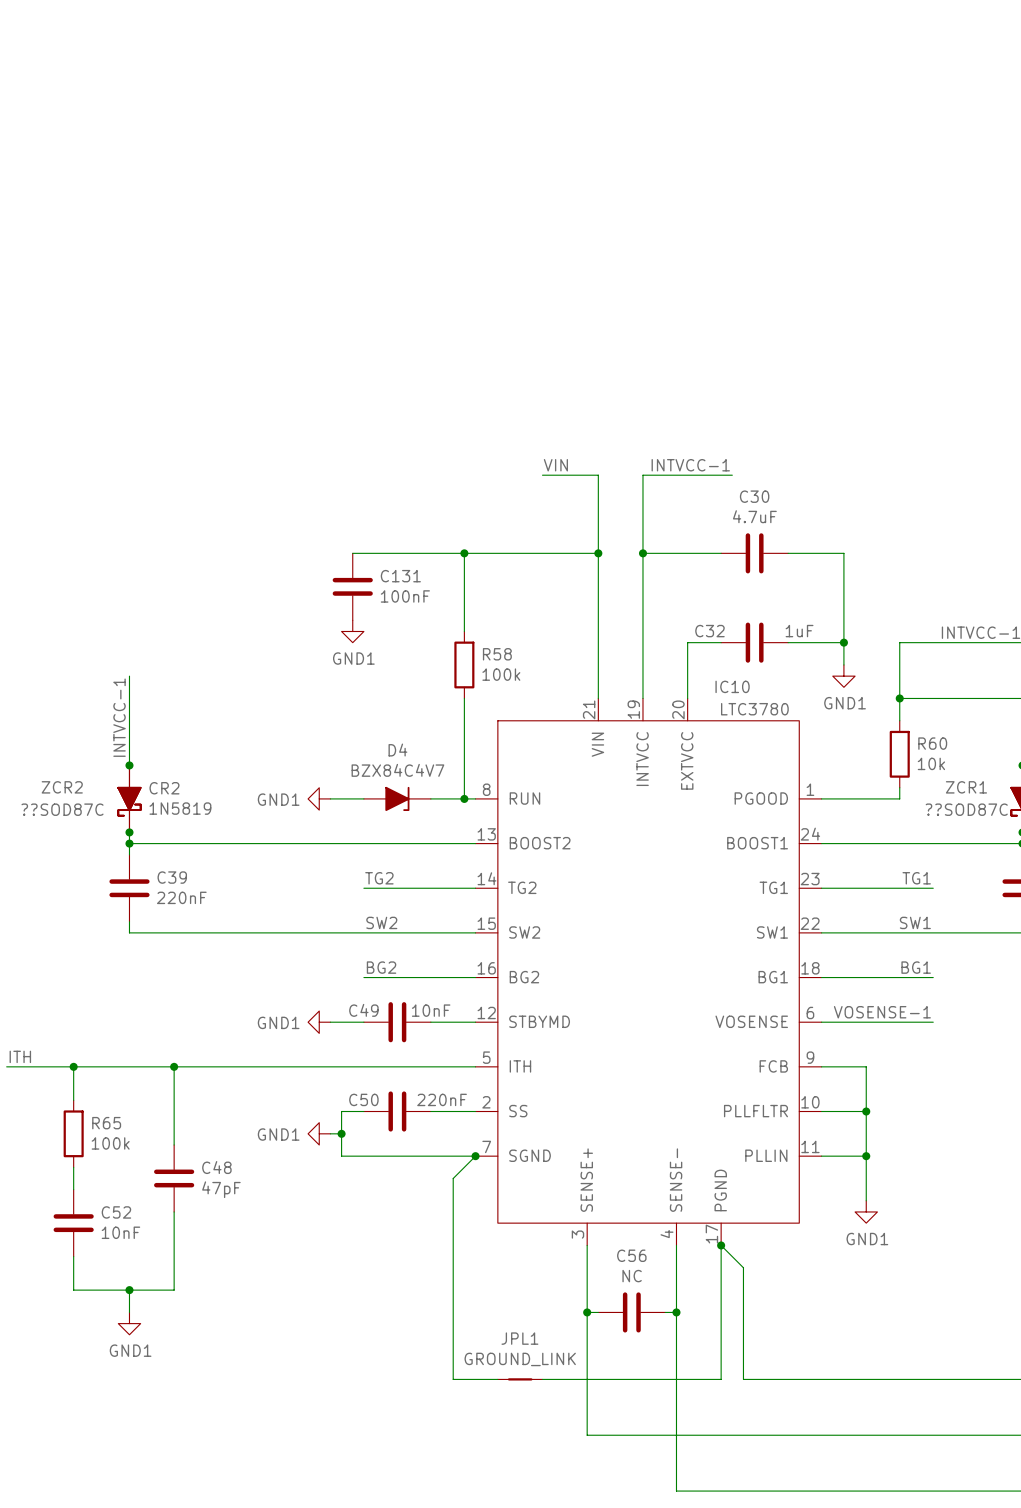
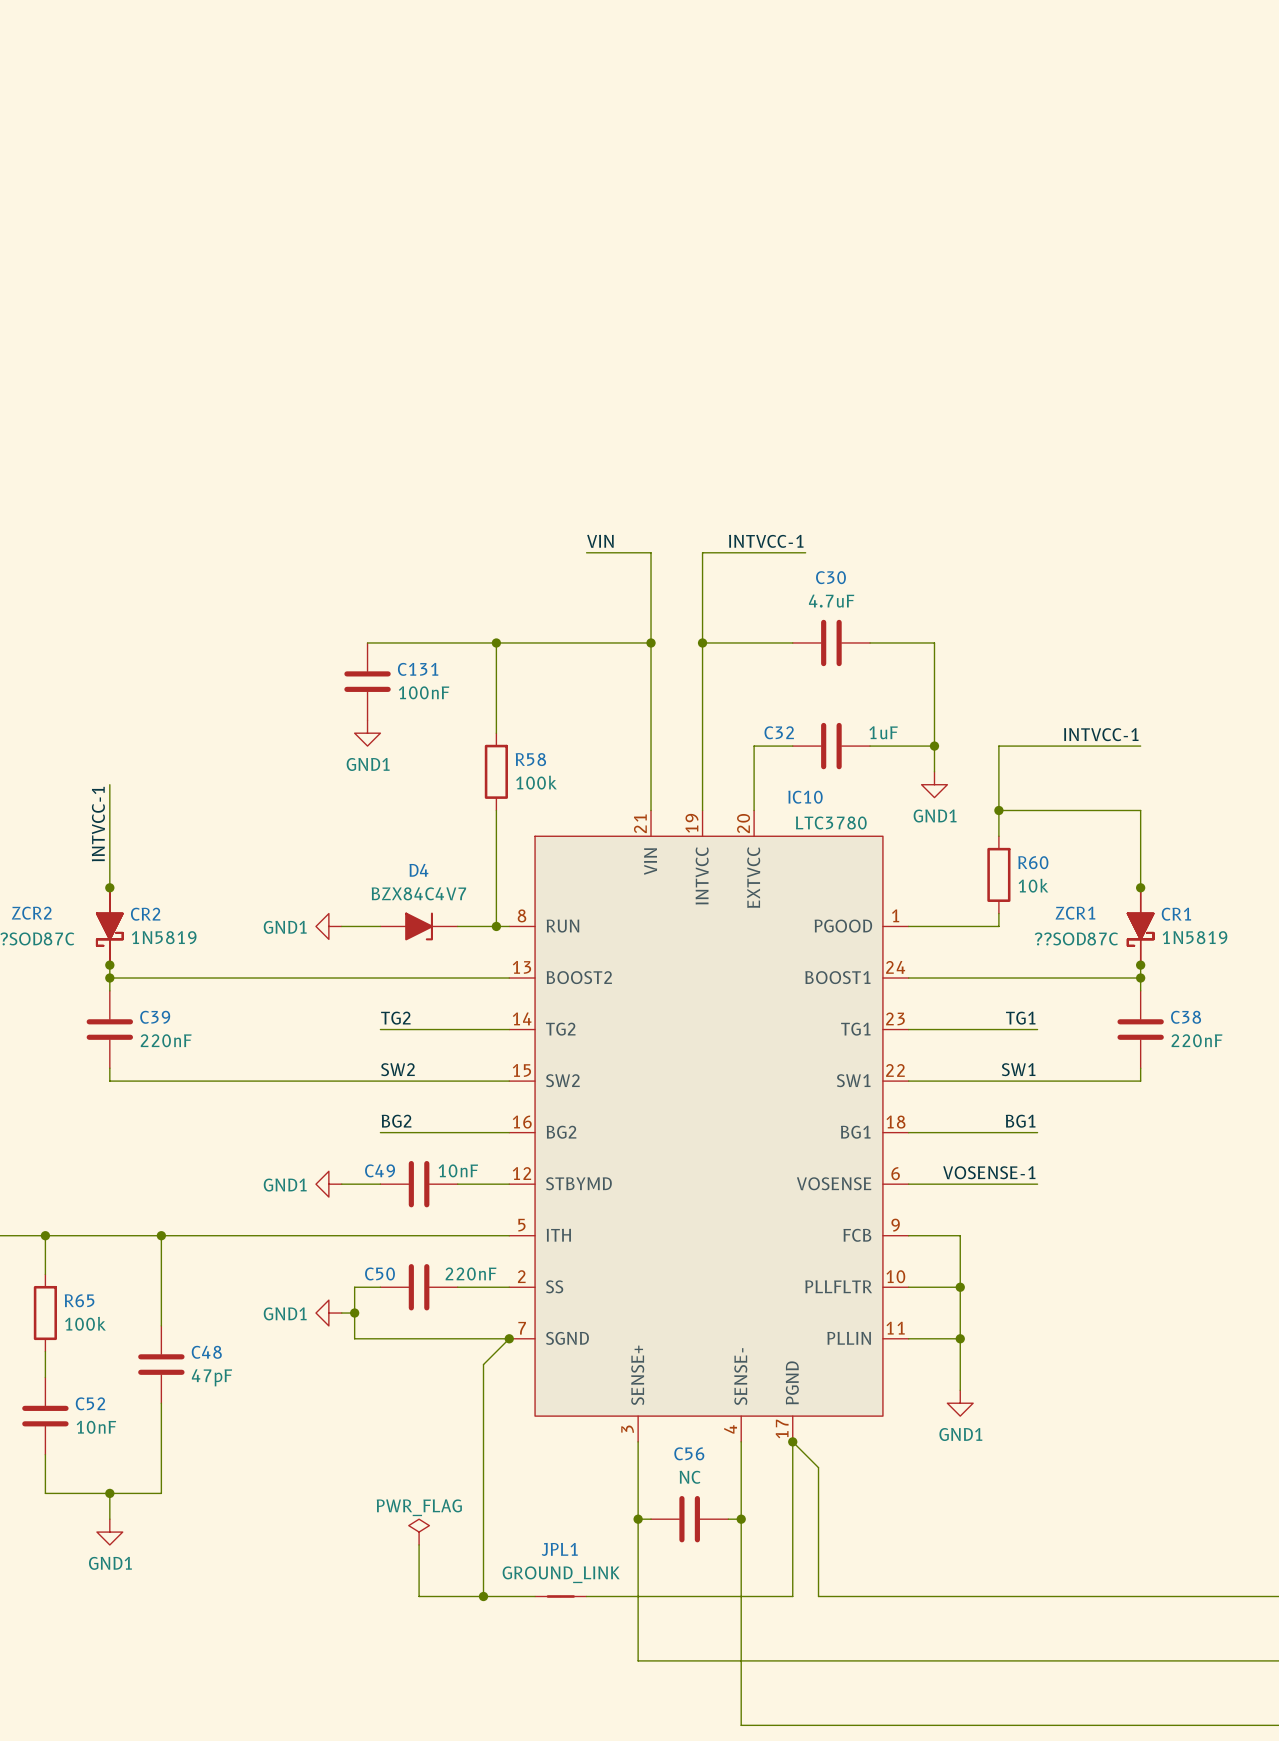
power symbol: none -> PWR_FLAG (419, 1532)
wire: none -> (419, 1544) (419, 1596) (483, 1596)
junction: none -> (483, 1596)

